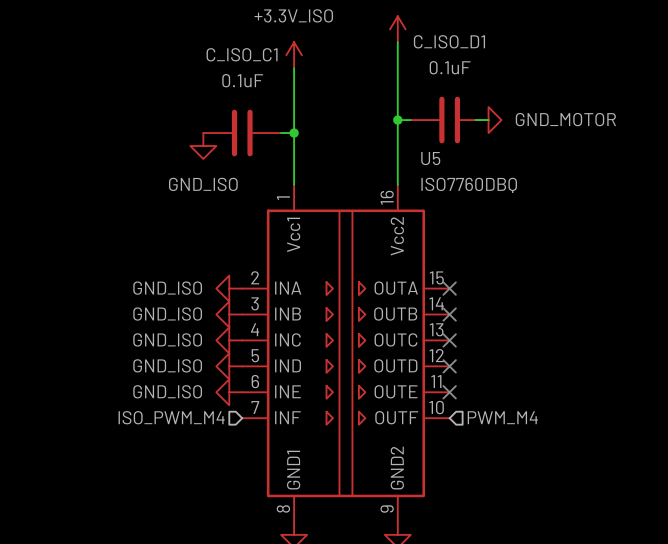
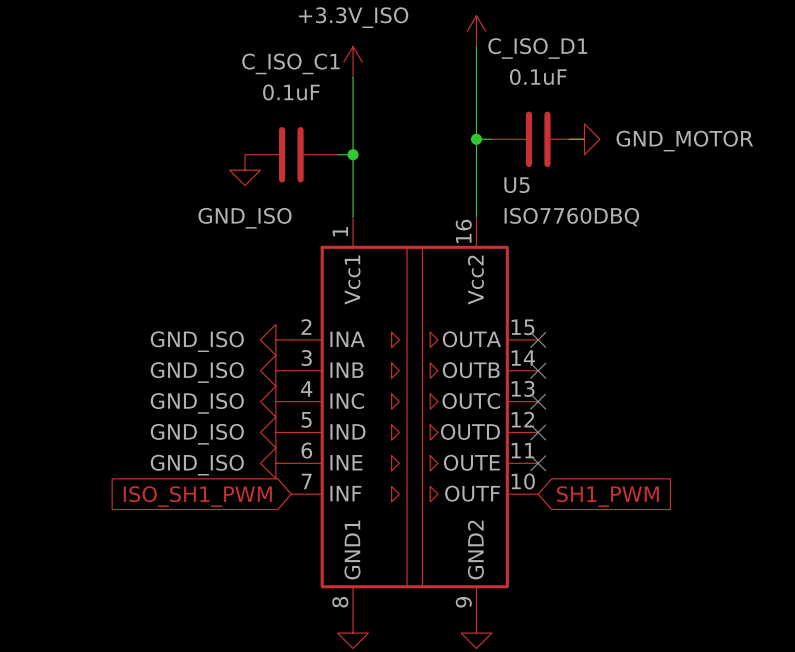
hierarchical label: ISO_PWM_M4 (171, 417) -> none
hierarchical label: PWM_M4 (502, 417) -> none
global label: none -> ISO_SH1_PWM (197, 496)
global label: none -> SH1_PWM (607, 496)

